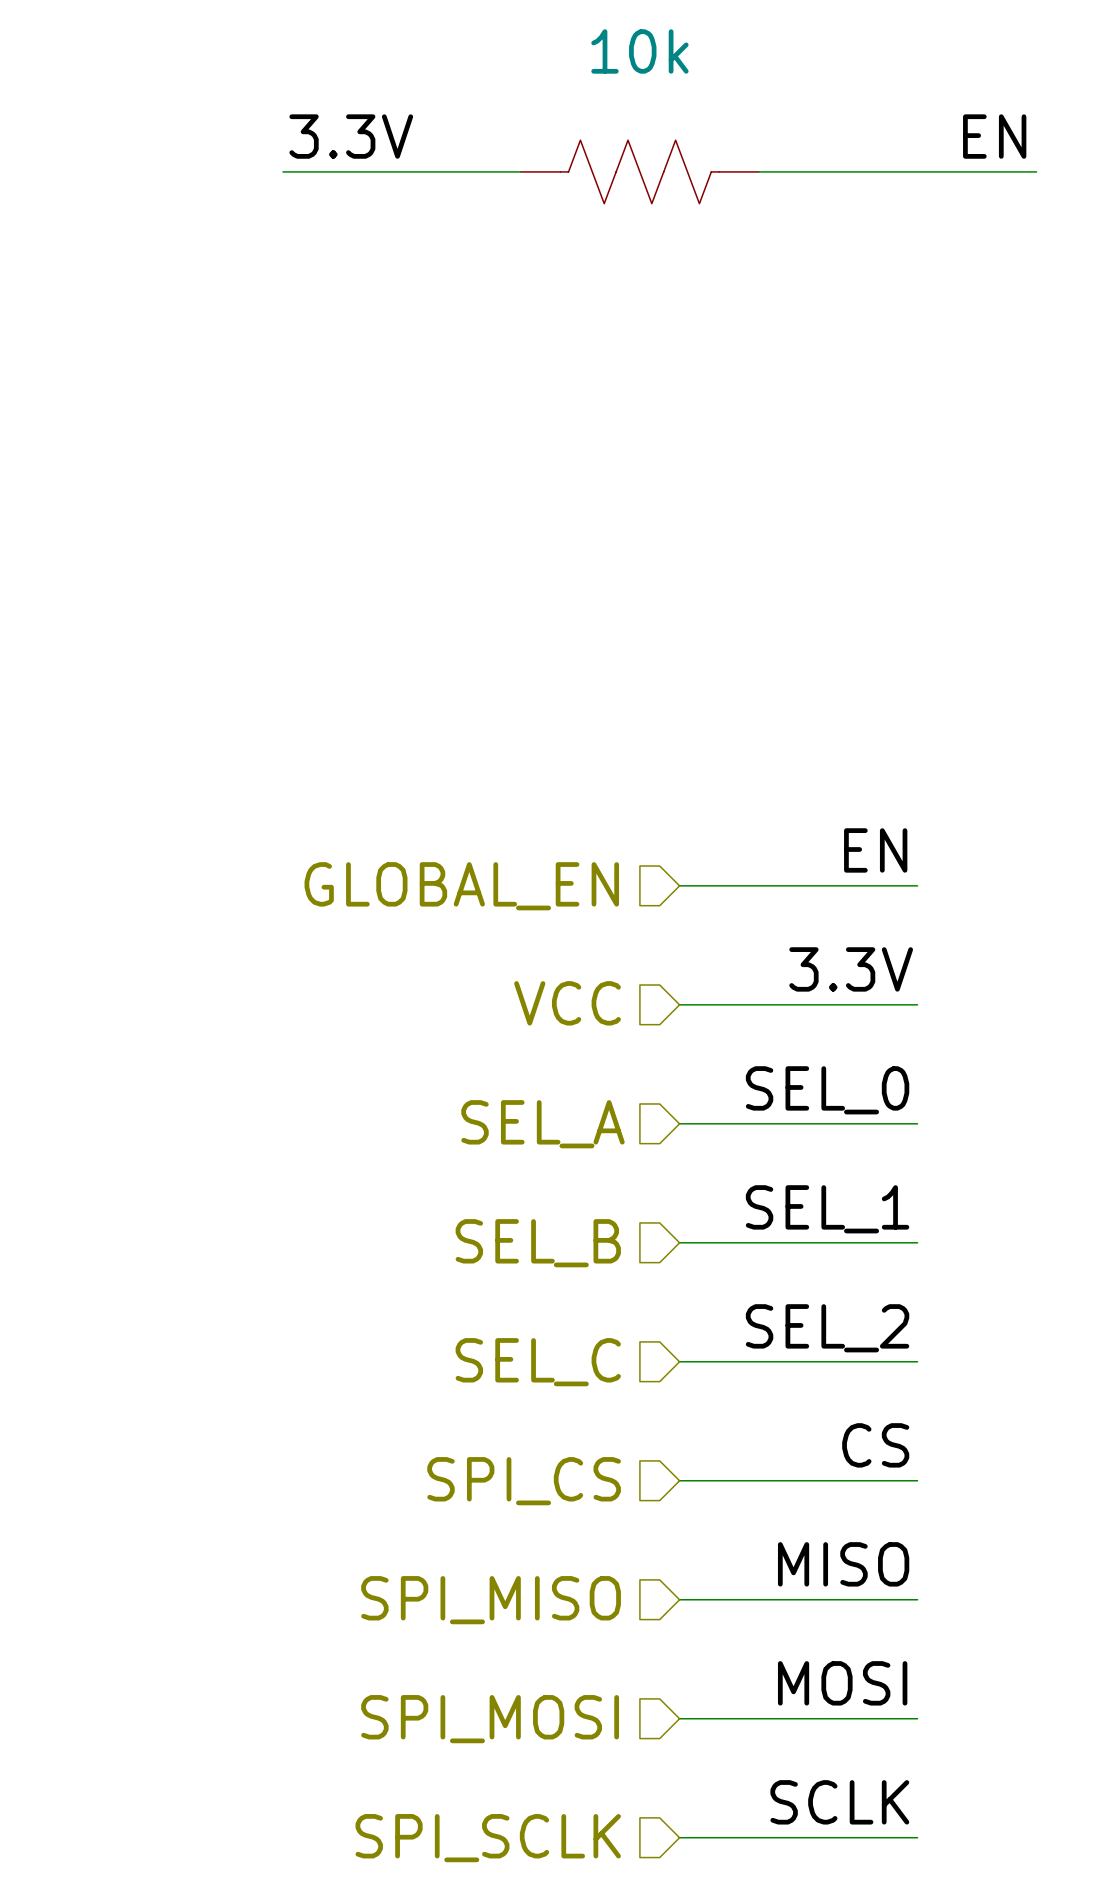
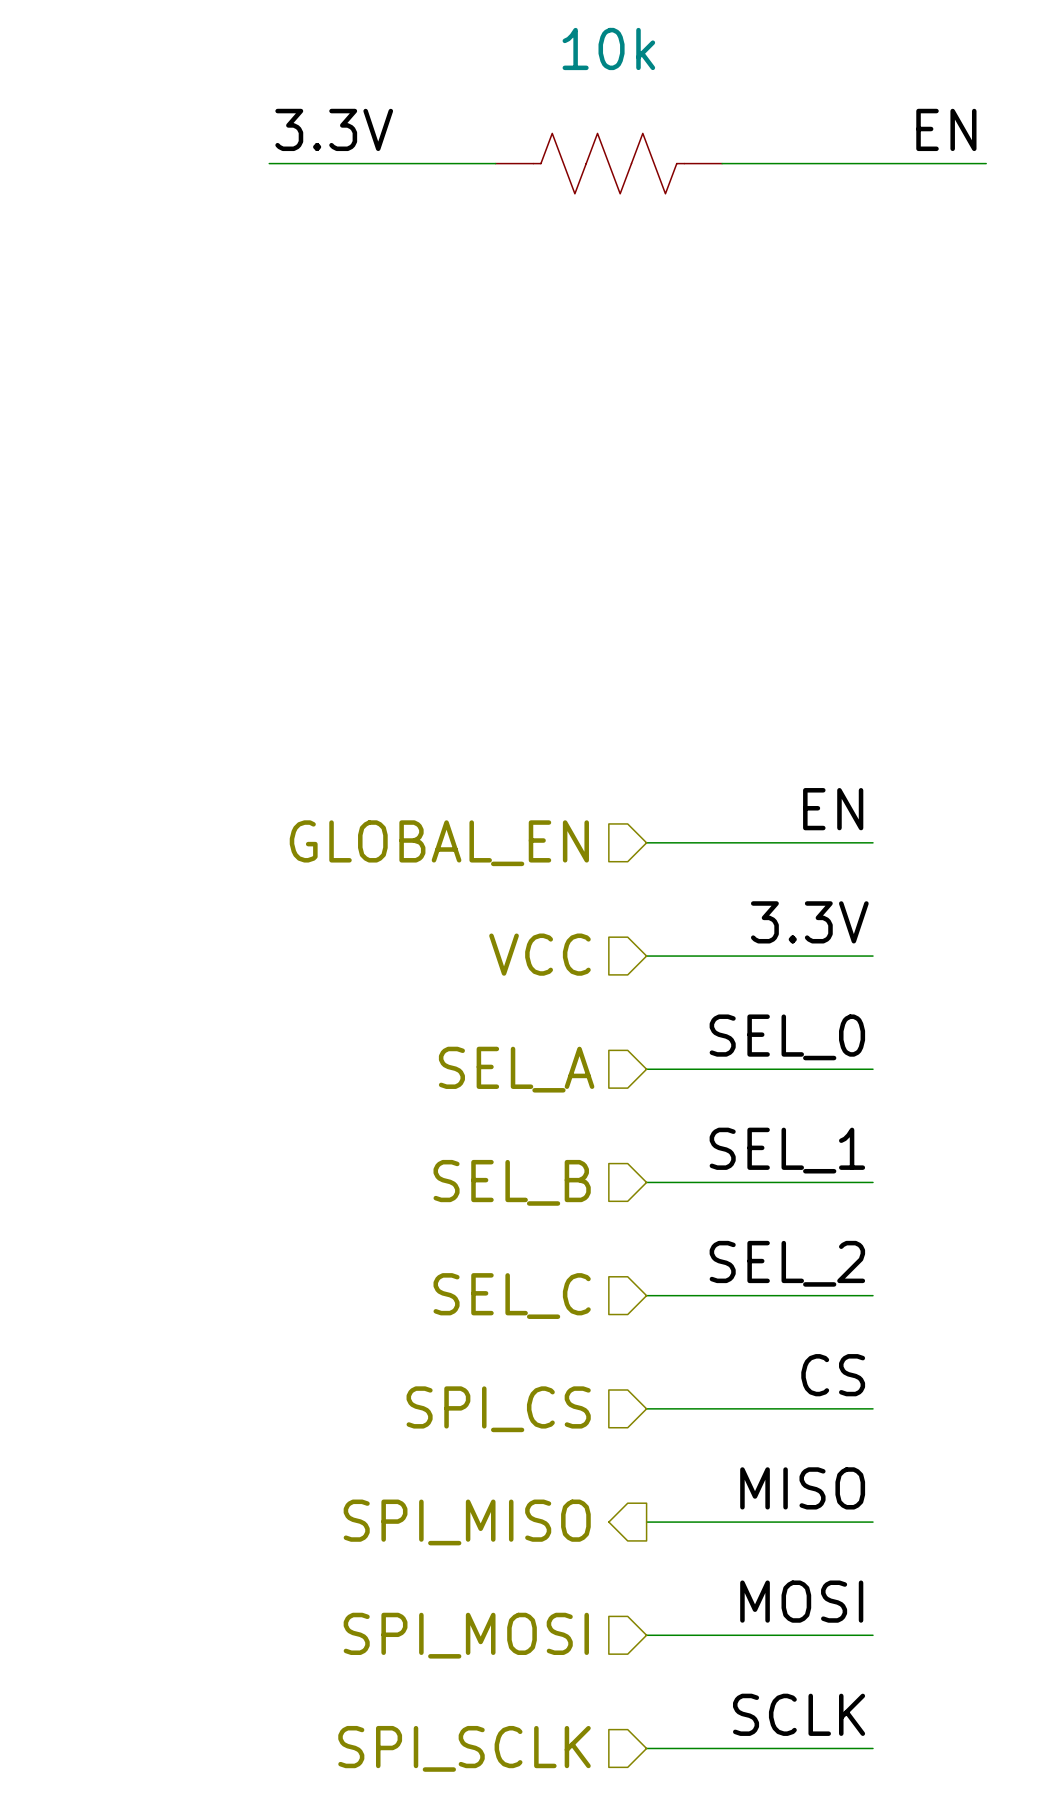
hierarchical label shape: input (491, 1600) -> output (467, 1522)

